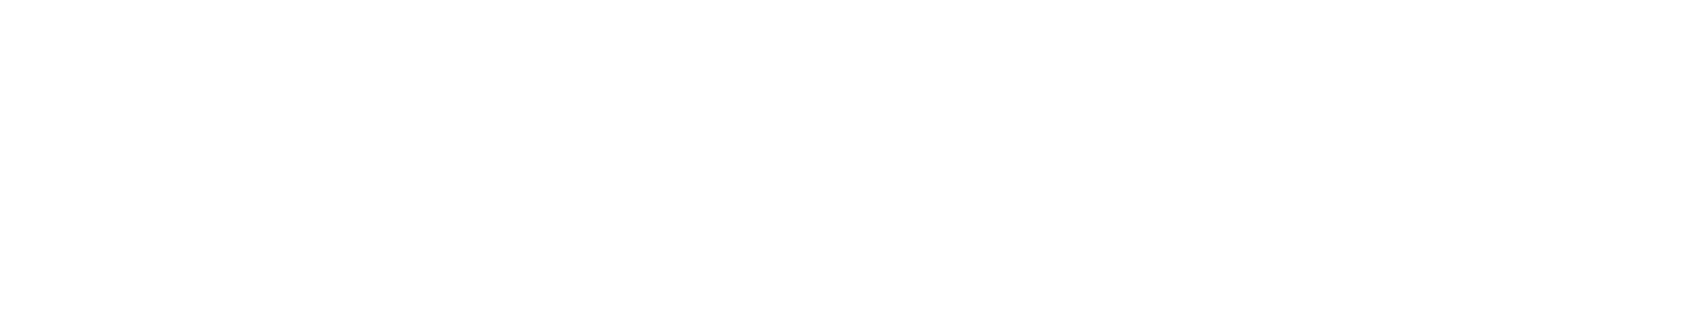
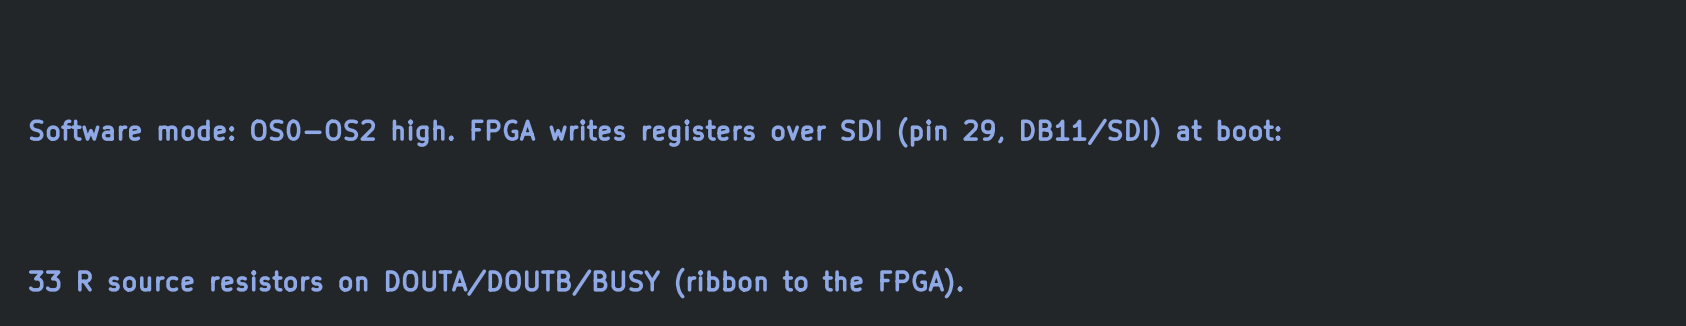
text: none -> Software mode: OS0-OS2 high. FPGA writes registers over SDI (pin 29, DB11/SDI) at boot: (655, 132)
text: none -> 33 R source resistors on DOUTA/DOUTB/BUSY (ribbon to the FPGA). (495, 283)

